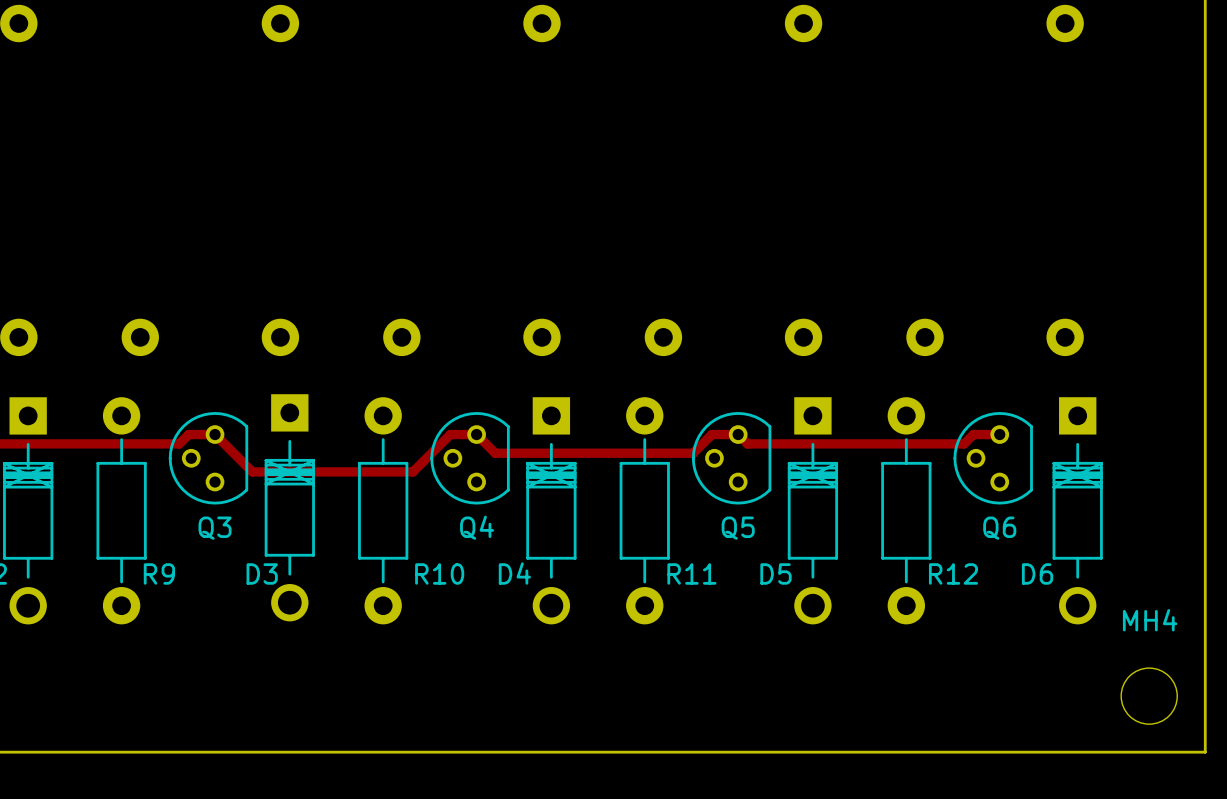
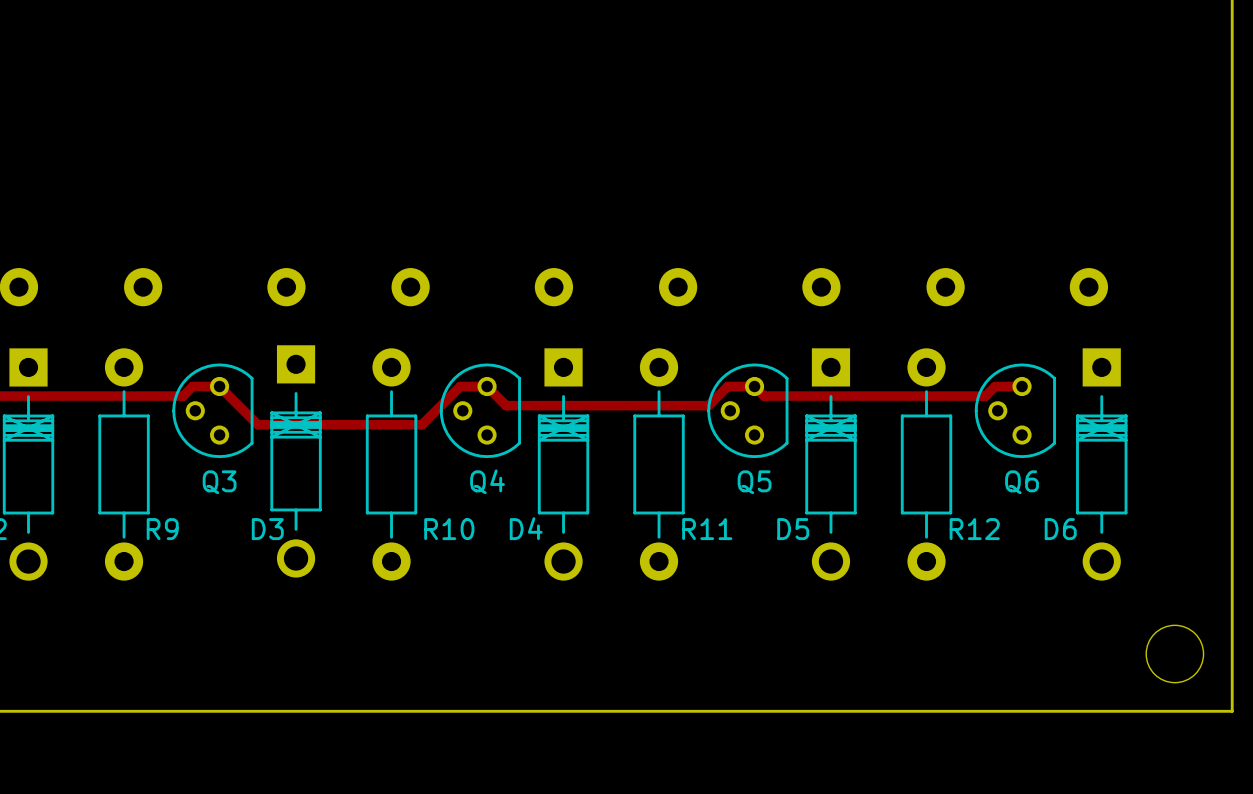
MH4 name: MH4 (1150, 620) -> none

